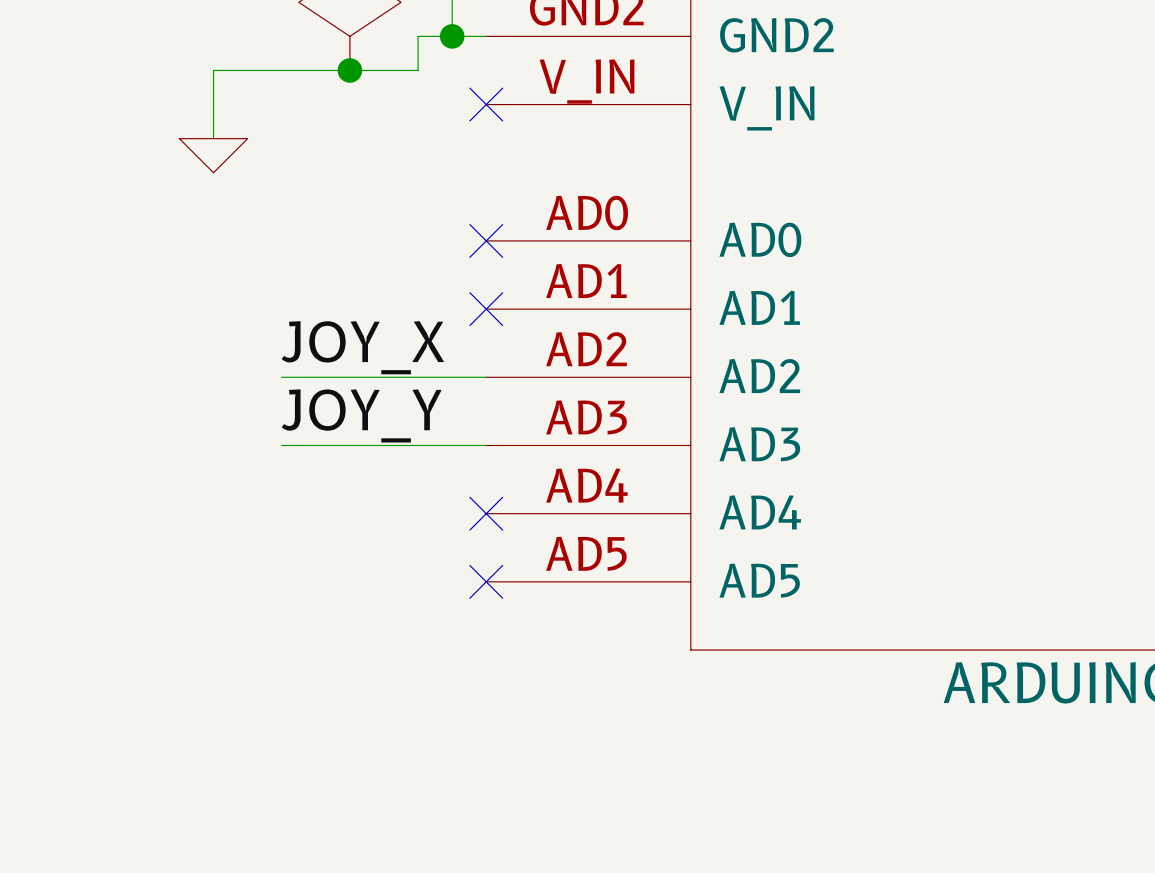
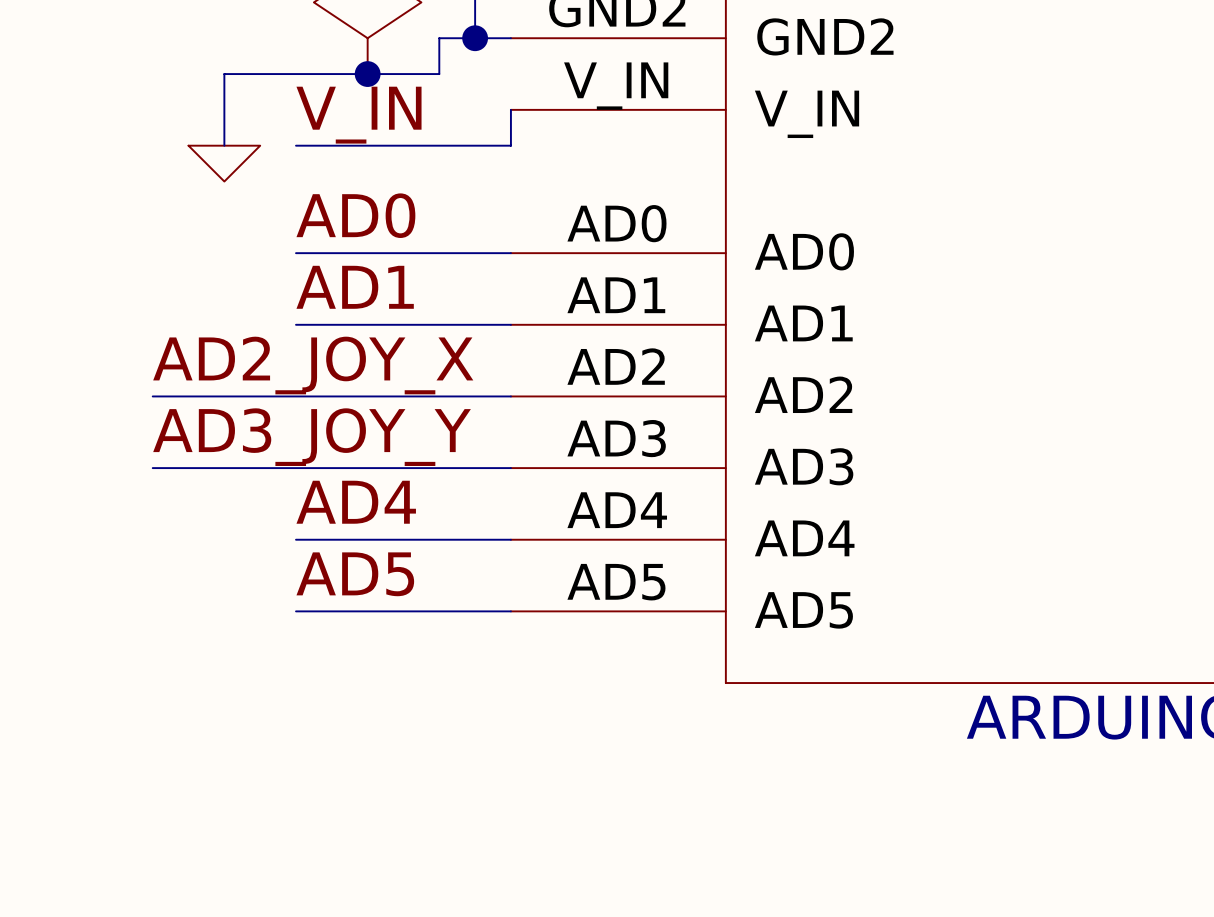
wire: none -> (510, 109) (510, 145) (296, 145)
no-connect mark: (486, 104) -> none
label: none -> V_IN (359, 115)
label: none -> AD0 (355, 215)
wire: none -> (296, 253) (510, 253)
no-connect mark: (486, 240) -> none
label: none -> AD1 (355, 287)
wire: none -> (296, 324) (510, 324)
no-connect mark: (486, 309) -> none
label: JOY_X (362, 347) -> AD2_JOY_X (313, 365)
wire: none -> (152, 396) (296, 396)
label: JOY_Y (361, 415) -> AD3_JOY_Y (312, 437)
wire: none -> (152, 468) (296, 468)
label: none -> AD4 (356, 502)
wire: none -> (296, 539) (510, 539)
no-connect mark: (486, 513) -> none
label: none -> AD5 (355, 574)
wire: none -> (296, 611) (510, 611)
no-connect mark: (486, 581) -> none

